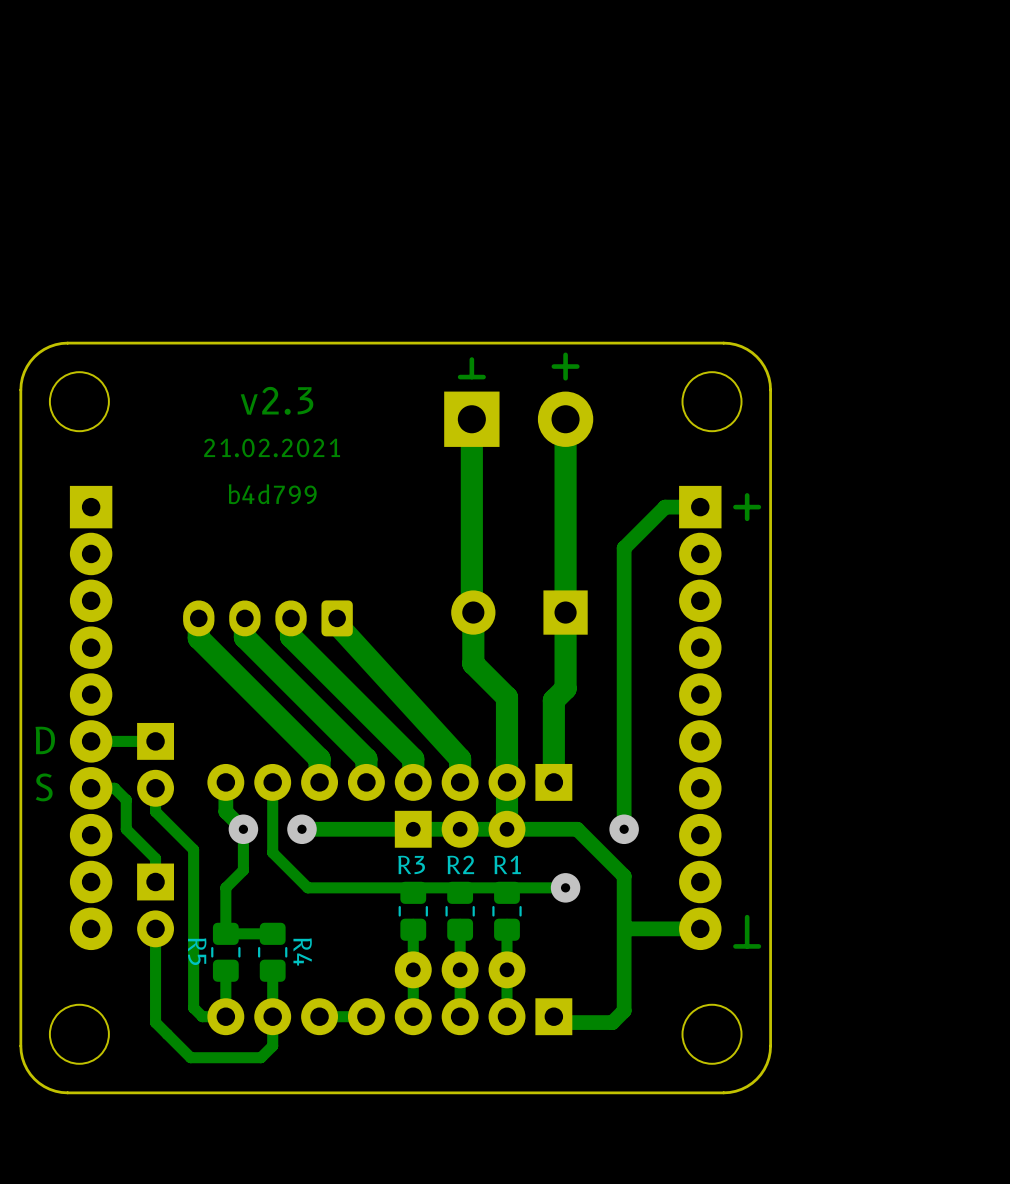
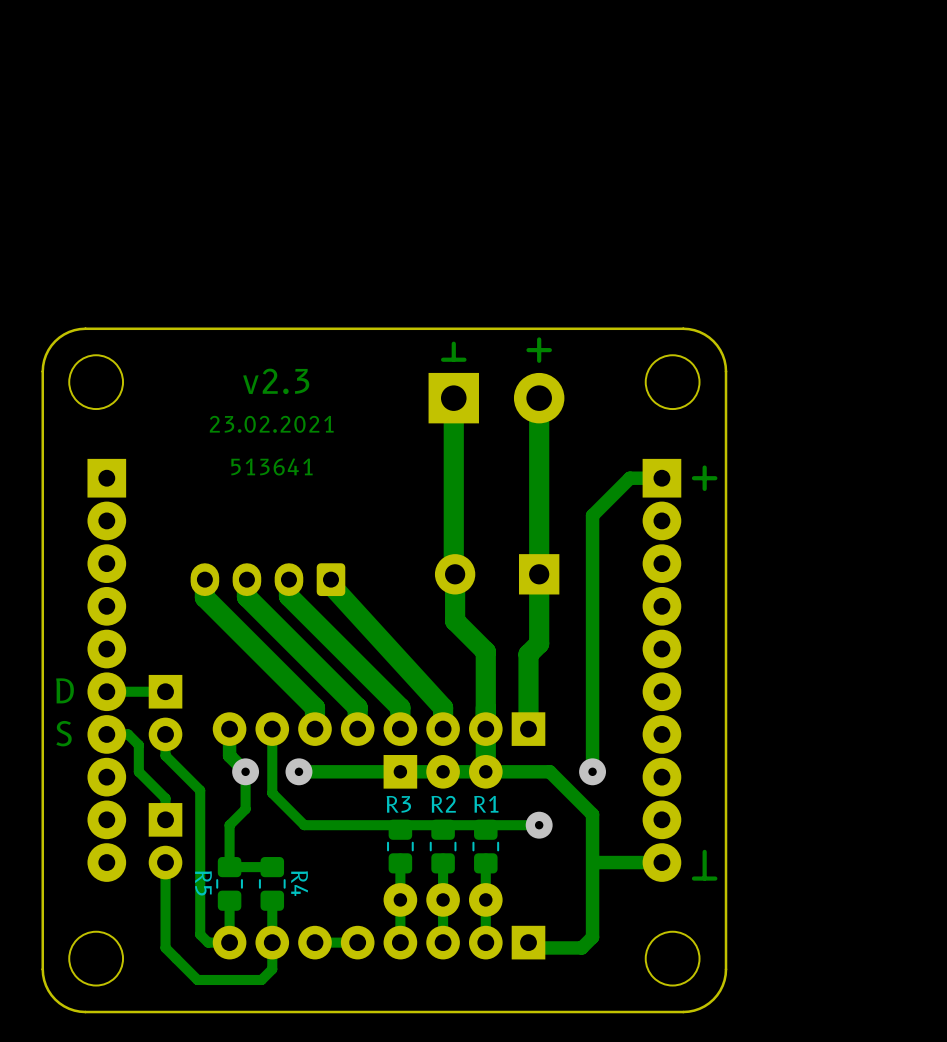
text: 21.02.2021 (272, 447) -> 23.02.2021 (271, 424)
text: b4d799 (272, 494) -> 513641 (272, 467)

